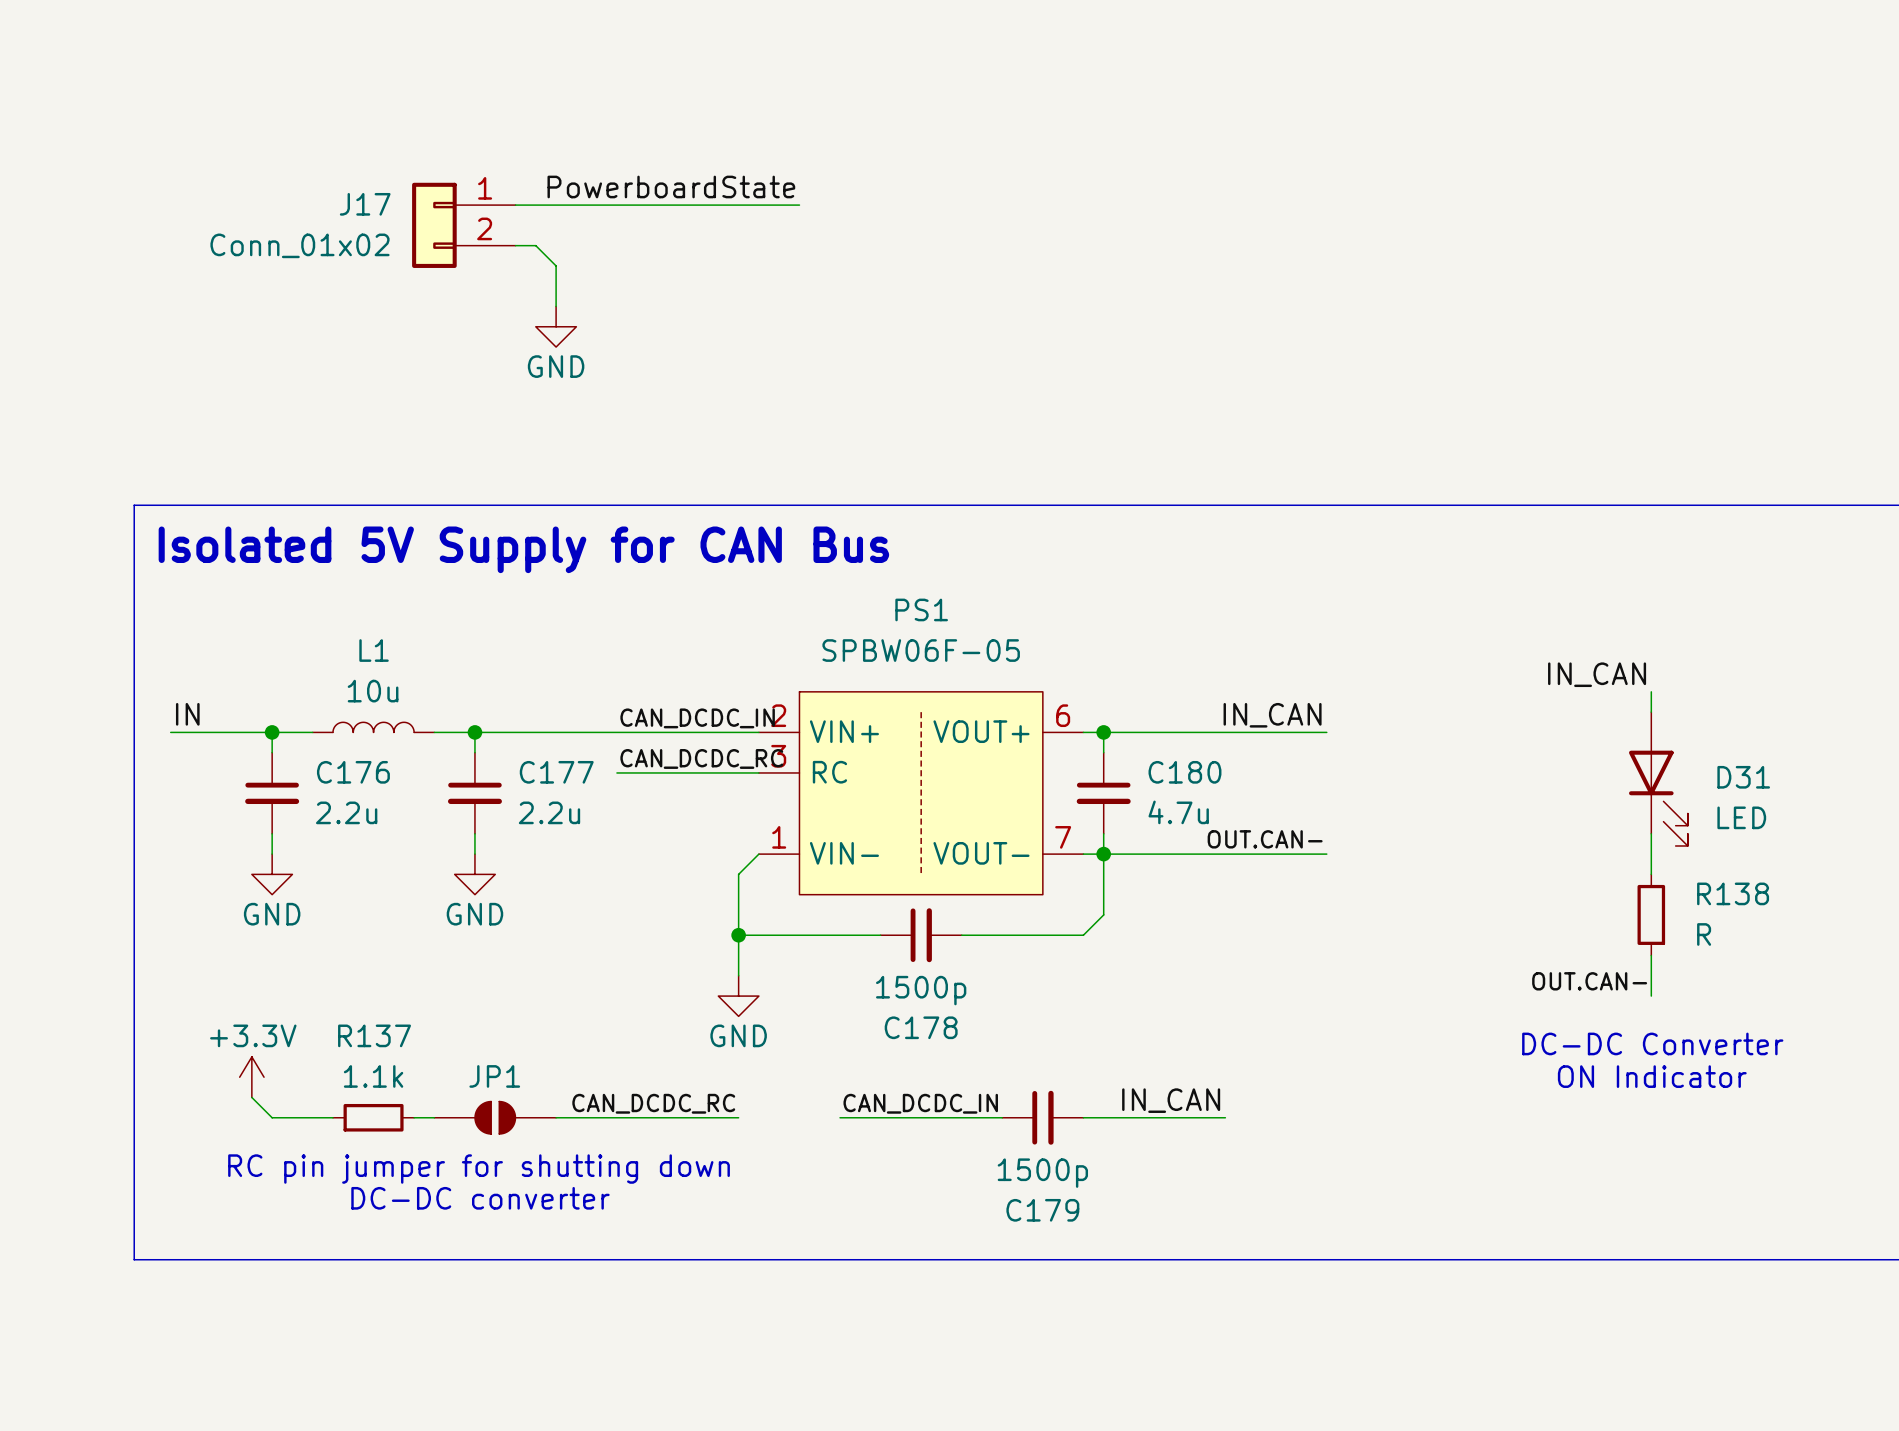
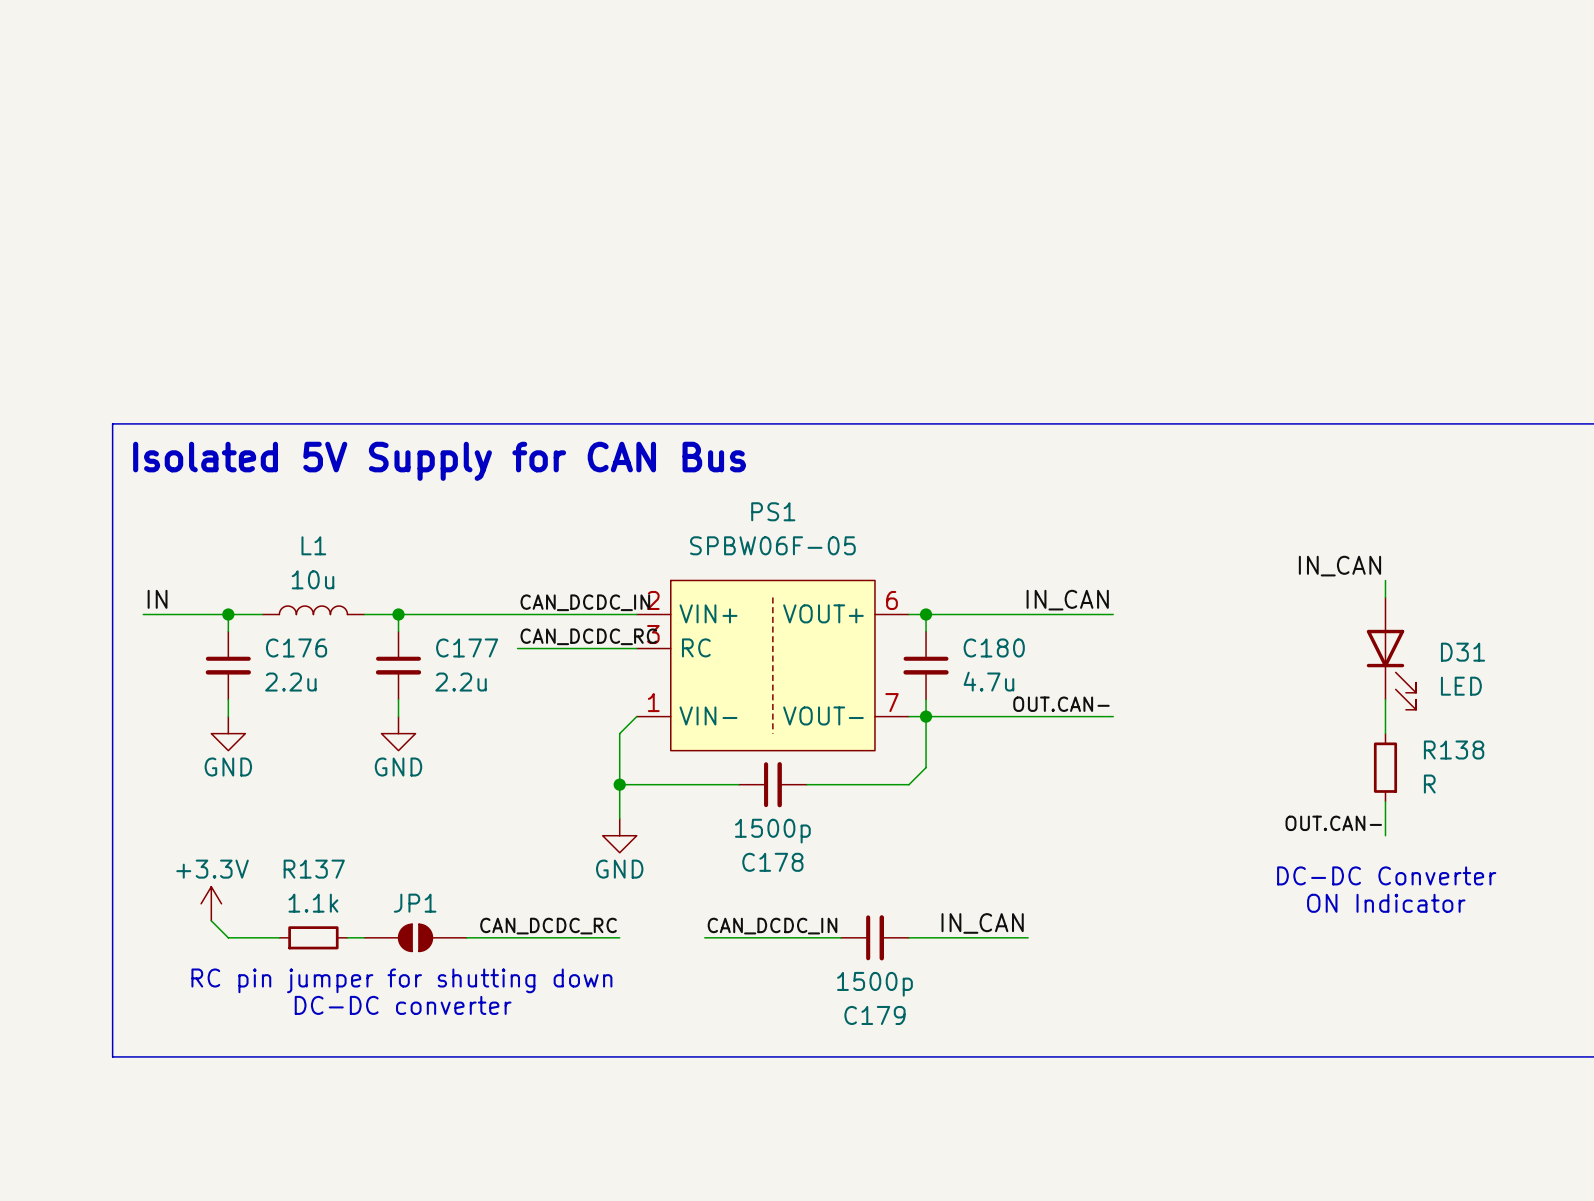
label: PowerboardState (671, 186) -> none
wire: (515, 205) (799, 205) -> none
J17: Conn_01x02 (463, 225) -> none
wire: (515, 245) (535, 245) (556, 265) (556, 306) -> none
power symbol: GND (556, 326) -> none

